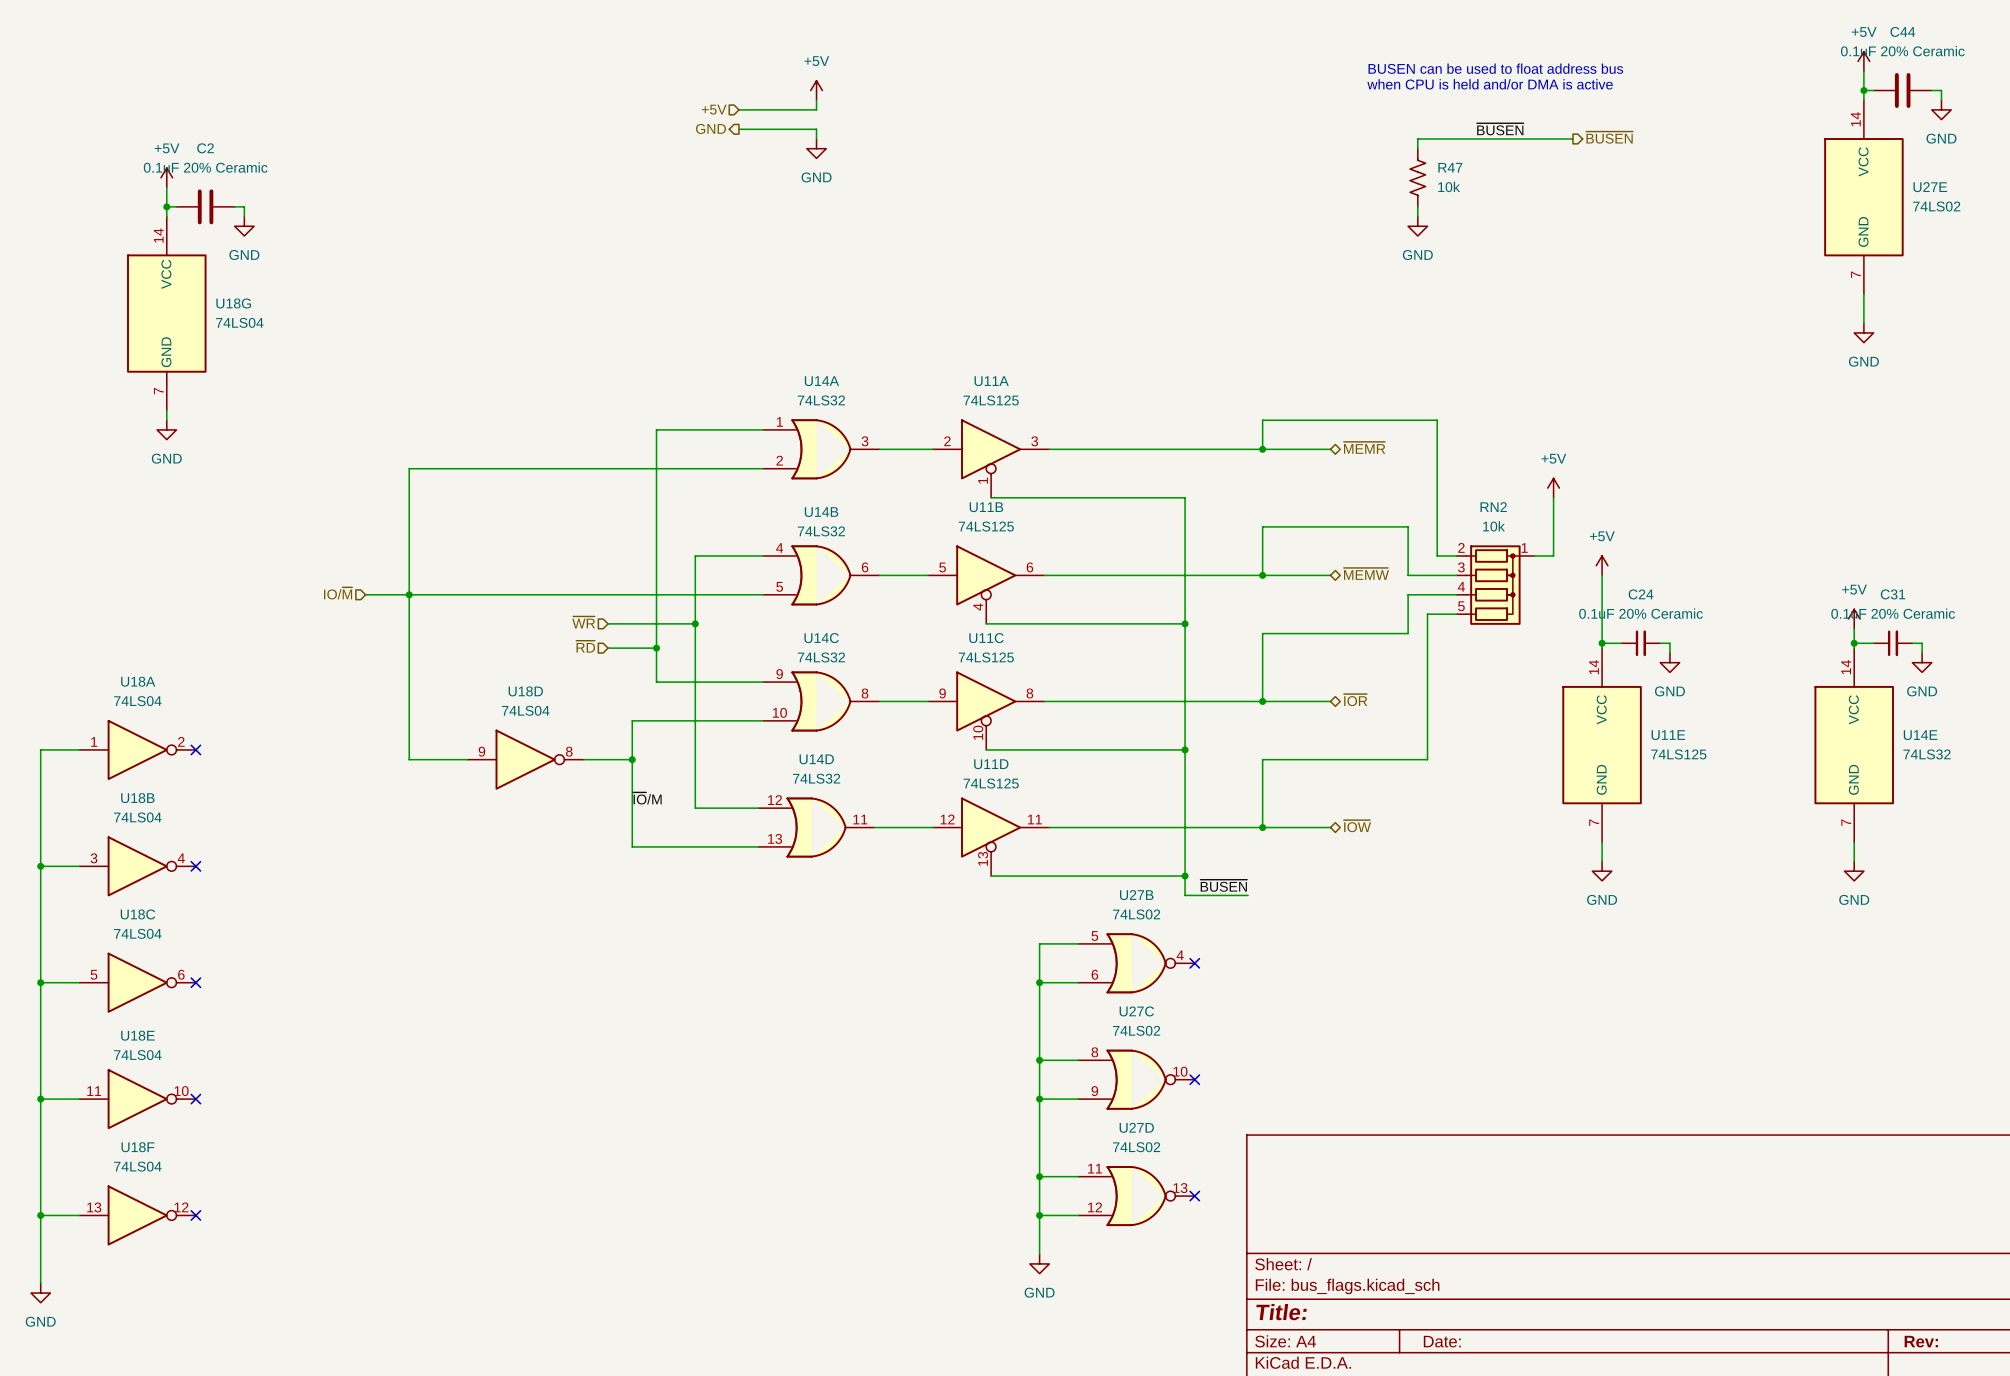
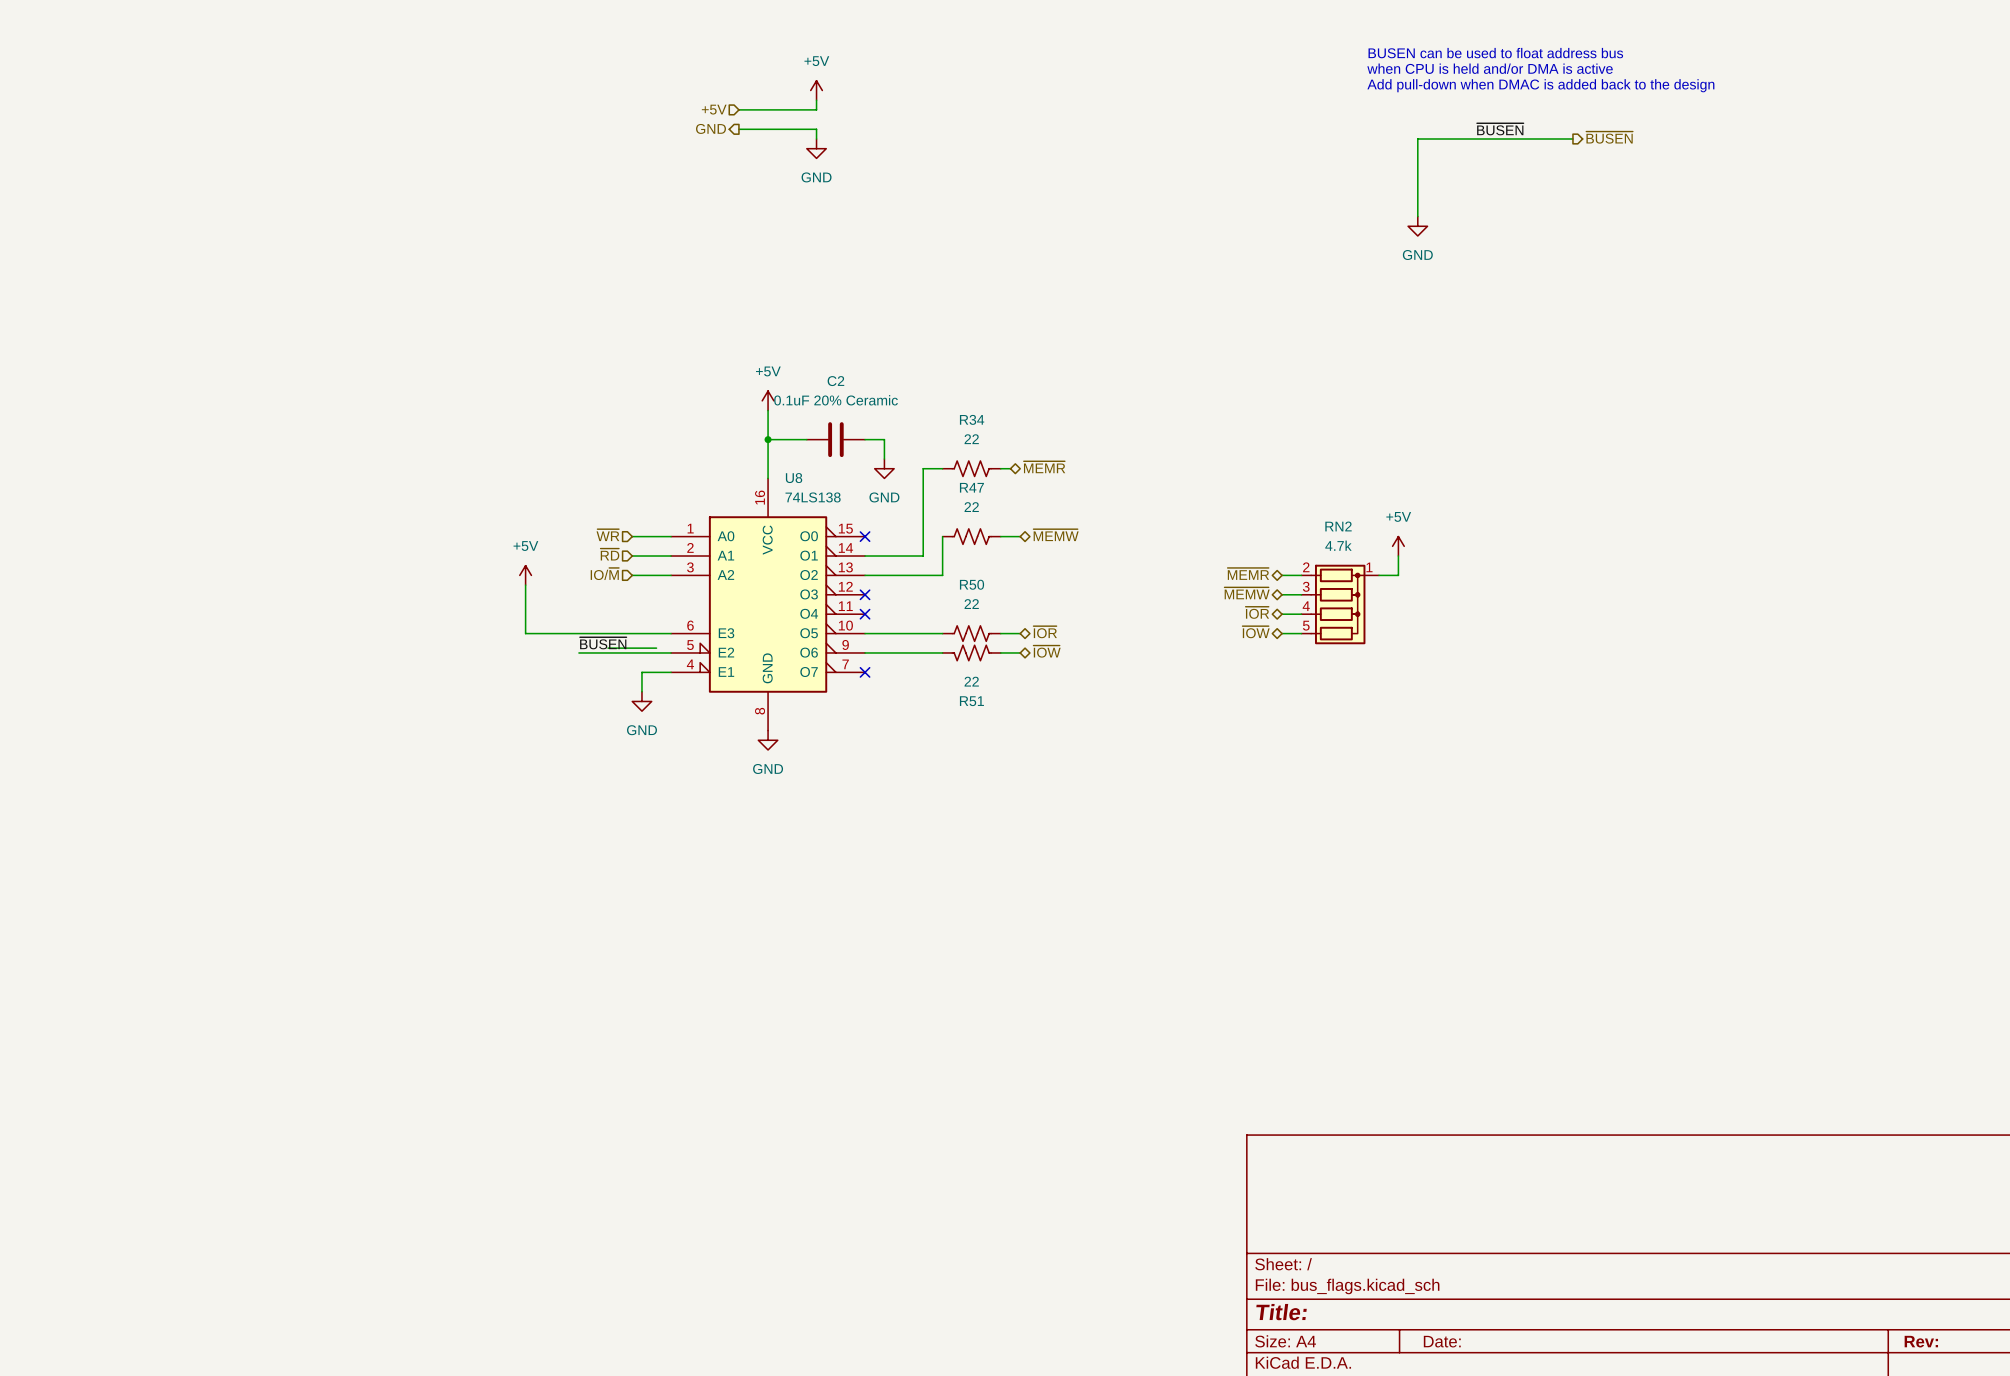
text: none -> BUSEN can be used to float address bus (1495, 53)
power symbol: +5V (1863, 61) -> none
text: BUSEN can be used to float address bus (1495, 68) -> when CPU is held and/or DMA is active (1490, 68)
wire: (1863, 71) (1863, 100) -> none
text: when CPU is held and/or DMA is active (1490, 84) -> Add pull-down when DMAC is added back to the design (1540, 85)
wire: (1863, 90) (1873, 90) -> none
junction: (1863, 90) -> none
C44: 0.1uF 20% Ceramic (1902, 90) -> none
wire: (1931, 90) (1941, 90) (1941, 100) -> none
power symbol: GND (1941, 109) -> none
R47 name position: R47 (1450, 167) -> R47 (971, 487)
power symbol: +5V (166, 177) -> none
R47 rotation: 0° (1417, 177) -> 90° clockwise (971, 536)
R47 position: (1417, 177) -> (971, 536)
R47 value: 10k (1449, 186) -> 22 (971, 507)
wire: (166, 187) (166, 216) -> none
U27E: 74LS02 (1863, 197) -> none
wire: (166, 206) (176, 206) -> none
junction: (166, 206) -> none
C2 position: (205, 206) -> (835, 439)
wire: (234, 206) (244, 206) (244, 216) -> none
power symbol: GND (244, 226) -> none
wire: (1863, 294) (1863, 323) -> none
U18G: 74LS04 (166, 313) -> none
power symbol: GND (1863, 332) -> none
power symbol: none -> +5V (768, 400)
wire: (166, 410) (166, 420) -> none
wire: none -> (768, 410) (768, 478)
power symbol: GND (166, 429) -> none
wire: (763, 429) (656, 429) (656, 682) (763, 682) -> none
wire: none -> (768, 439) (806, 439)
junction: none -> (768, 439)
wire: none -> (865, 439) (884, 439) (884, 459)
hierarchical label rotation: 0° (1364, 447) -> 180° (1248, 573)
hierarchical label position: ~{MEMR} (1364, 447) -> ~{MEMR} (1248, 573)
U14A: 74LS32 (821, 449) -> none
wire: (879, 449) (932, 449) -> none
wire: (1049, 449) (1330, 449) -> none
wire: (1262, 449) (1262, 420) (1437, 420) (1437, 556) (1456, 556) -> none
junction: (1262, 449) -> none
U11A: 74LS125 (991, 458) -> none
hierarchical label: none -> ~{MEMR} (1044, 467)
wire: (763, 468) (409, 468) (409, 759) (467, 759) -> none
power symbol: none -> GND (884, 468)
wire: none -> (942, 468) (923, 468) (923, 556) (865, 556)
R34: none -> 22 (971, 468)
wire: none -> (1000, 468) (1010, 468)
power symbol: +5V (1553, 488) -> none
wire: (991, 497) (1185, 497) (1185, 895) (1248, 895) -> none
wire: (1553, 497) (1553, 556) (1534, 556) -> none
RN2 value: 10k (1493, 526) -> 4.7k (1338, 545)
hierarchical label: none -> ~{MEMW} (1056, 535)
wire: none -> (632, 536) (671, 536)
no-connect mark: none -> (865, 536)
wire: none -> (942, 536) (942, 575) (928, 575)
wire: none -> (1000, 536) (1020, 536)
power symbol: none -> +5V (1398, 546)
wire: none -> (632, 556) (671, 556)
wire: (763, 556) (695, 556) (695, 808) (758, 808) -> none
wire: none -> (1398, 556) (1398, 575) (1379, 575)
power symbol: +5V (1602, 565) -> none
hierarchical label: none -> IO/~{M} (604, 573)
hierarchical label rotation: 0° (1366, 573) -> 180° (1247, 593)
hierarchical label position: ~{MEMW} (1366, 573) -> ~{MEMW} (1247, 593)
power symbol: none -> +5V (525, 575)
wire: none -> (632, 575) (671, 575)
U14B: 74LS32 (821, 575) -> none
wire: (1044, 575) (1282, 575) -> none
wire: (1262, 575) (1262, 526) (1408, 526) (1408, 575) (1456, 575) -> none
junction: (1262, 575) -> none
wire: (1602, 575) (1602, 648) -> none
U11B: 74LS125 (986, 584) -> none
wire: none -> (525, 585) (525, 633) (671, 633)
RN2 position: (1495, 585) -> (1340, 604)
hierarchical label: IO/~{M} (338, 593) -> none
wire: (365, 594) (763, 594) -> none
junction: (409, 594) -> none
no-connect mark: none -> (865, 594)
wire: none -> (1282, 594) (1301, 594)
wire: (1456, 594) (1408, 594) (1408, 633) (1301, 633) -> none
U8: none -> 74LS138 (768, 604)
no-connect mark: none -> (865, 614)
wire: none -> (1282, 614) (1301, 614)
wire: (1456, 614) (1427, 614) (1427, 759) (1262, 759) (1262, 827) -> none
power symbol: +5V (1854, 619) -> none
hierarchical label position: ~{WR} (583, 622) -> ~{WR} (607, 535)
wire: (608, 623) (695, 623) -> none
junction: (695, 623) -> none
wire: (986, 623) (1185, 623) -> none
junction: (1185, 623) -> none
wire: (1854, 628) (1854, 648) -> none
hierarchical label: none -> ~{IOR} (1045, 632)
hierarchical label: none -> ~{IOW} (1256, 632)
wire: none -> (865, 633) (942, 633)
R50: none -> 22 (971, 633)
wire: none -> (1000, 633) (1020, 633)
wire: (1282, 633) (1262, 633) (1262, 701) -> none
label: none -> ~{BUSEN} (603, 643)
wire: (1602, 643) (1621, 643) -> none
junction: (1602, 643) -> none
C24: 0.1uF 20% Ceramic (1640, 643) -> none
wire: (1660, 643) (1669, 643) (1669, 652) -> none
wire: (1854, 643) (1873, 643) -> none
junction: (1854, 643) -> none
C31: 0.1uF 20% Ceramic (1893, 643) -> none
wire: (1912, 643) (1922, 643) (1922, 652) -> none
hierarchical label position: ~{RD} (585, 646) -> ~{RD} (609, 554)
junction: (656, 648) -> none
hierarchical label: none -> ~{IOW} (1047, 651)
wire: none -> (578, 652) (671, 652)
wire: none -> (865, 652) (942, 652)
R51: none -> 22 (971, 652)
wire: none -> (1000, 652) (1020, 652)
power symbol: GND (1669, 662) -> none
power symbol: GND (1922, 662) -> none
wire: none -> (671, 672) (641, 672) (641, 691)
no-connect mark: none -> (865, 672)
hierarchical label rotation: 0° (1355, 700) -> 180° (1257, 612)
hierarchical label position: ~{IOR} (1355, 700) -> ~{IOR} (1257, 612)
power symbol: none -> GND (641, 701)
U14C: 74LS32 (821, 701) -> none
wire: (879, 701) (928, 701) -> none
wire: (1044, 701) (1330, 701) -> none
junction: (1262, 701) -> none
U11C: 74LS125 (986, 710) -> none
wire: (763, 720) (632, 720) (632, 846) (758, 846) -> none
power symbol: none -> GND (768, 740)
U11E: 74LS125 (1602, 745) -> none
U14E: 74LS32 (1854, 745) -> none
wire: (79, 749) (40, 749) (40, 1283) -> none
U18A: 74LS04 (137, 749) -> none
no-connect mark: (195, 749) -> none
wire: (986, 749) (1185, 749) -> none
junction: (1185, 749) -> none
U18D: 74LS04 (525, 759) -> none
wire: (583, 759) (632, 759) -> none
junction: (632, 759) -> none
label: ~{IO}/M (647, 798) -> none
hierarchical label: ~{IOW} (1357, 826) -> none
U14D: 74LS32 (816, 827) -> none
wire: (874, 827) (932, 827) -> none
wire: (1049, 827) (1330, 827) -> none
junction: (1262, 827) -> none
U11D: 74LS125 (991, 836) -> none
wire: (1602, 842) (1602, 861) -> none
wire: (1854, 842) (1854, 861) -> none
wire: (40, 866) (79, 866) -> none
junction: (40, 866) -> none
U18B: 74LS04 (137, 866) -> none
no-connect mark: (195, 866) -> none
power symbol: GND (1602, 871) -> none
power symbol: GND (1854, 871) -> none
wire: (991, 876) (1185, 876) -> none
junction: (1185, 876) -> none
label: ~{BUSEN} (1223, 885) -> none
wire: (1078, 943) (1039, 943) (1039, 1254) -> none
U27B: 74LS02 (1136, 963) -> none
no-connect mark: (1194, 963) -> none
wire: (40, 982) (79, 982) -> none
junction: (40, 982) -> none
U18C: 74LS04 (137, 982) -> none
no-connect mark: (195, 982) -> none
wire: (1039, 982) (1078, 982) -> none
junction: (1039, 982) -> none
wire: (1039, 1060) (1078, 1060) -> none
junction: (1039, 1060) -> none
U27C: 74LS02 (1136, 1079) -> none
no-connect mark: (1194, 1079) -> none
wire: (40, 1099) (79, 1099) -> none
junction: (40, 1099) -> none
U18E: 74LS04 (137, 1099) -> none
no-connect mark: (195, 1099) -> none
wire: (1039, 1099) (1078, 1099) -> none
junction: (1039, 1099) -> none
wire: (1039, 1176) (1078, 1176) -> none
junction: (1039, 1176) -> none
U27D: 74LS02 (1136, 1196) -> none
no-connect mark: (1194, 1196) -> none
wire: (40, 1215) (79, 1215) -> none
junction: (40, 1215) -> none
U18F: 74LS04 (137, 1215) -> none
no-connect mark: (195, 1215) -> none
wire: (1039, 1215) (1078, 1215) -> none
junction: (1039, 1215) -> none
power symbol: GND (1039, 1263) -> none
power symbol: GND (40, 1293) -> none

